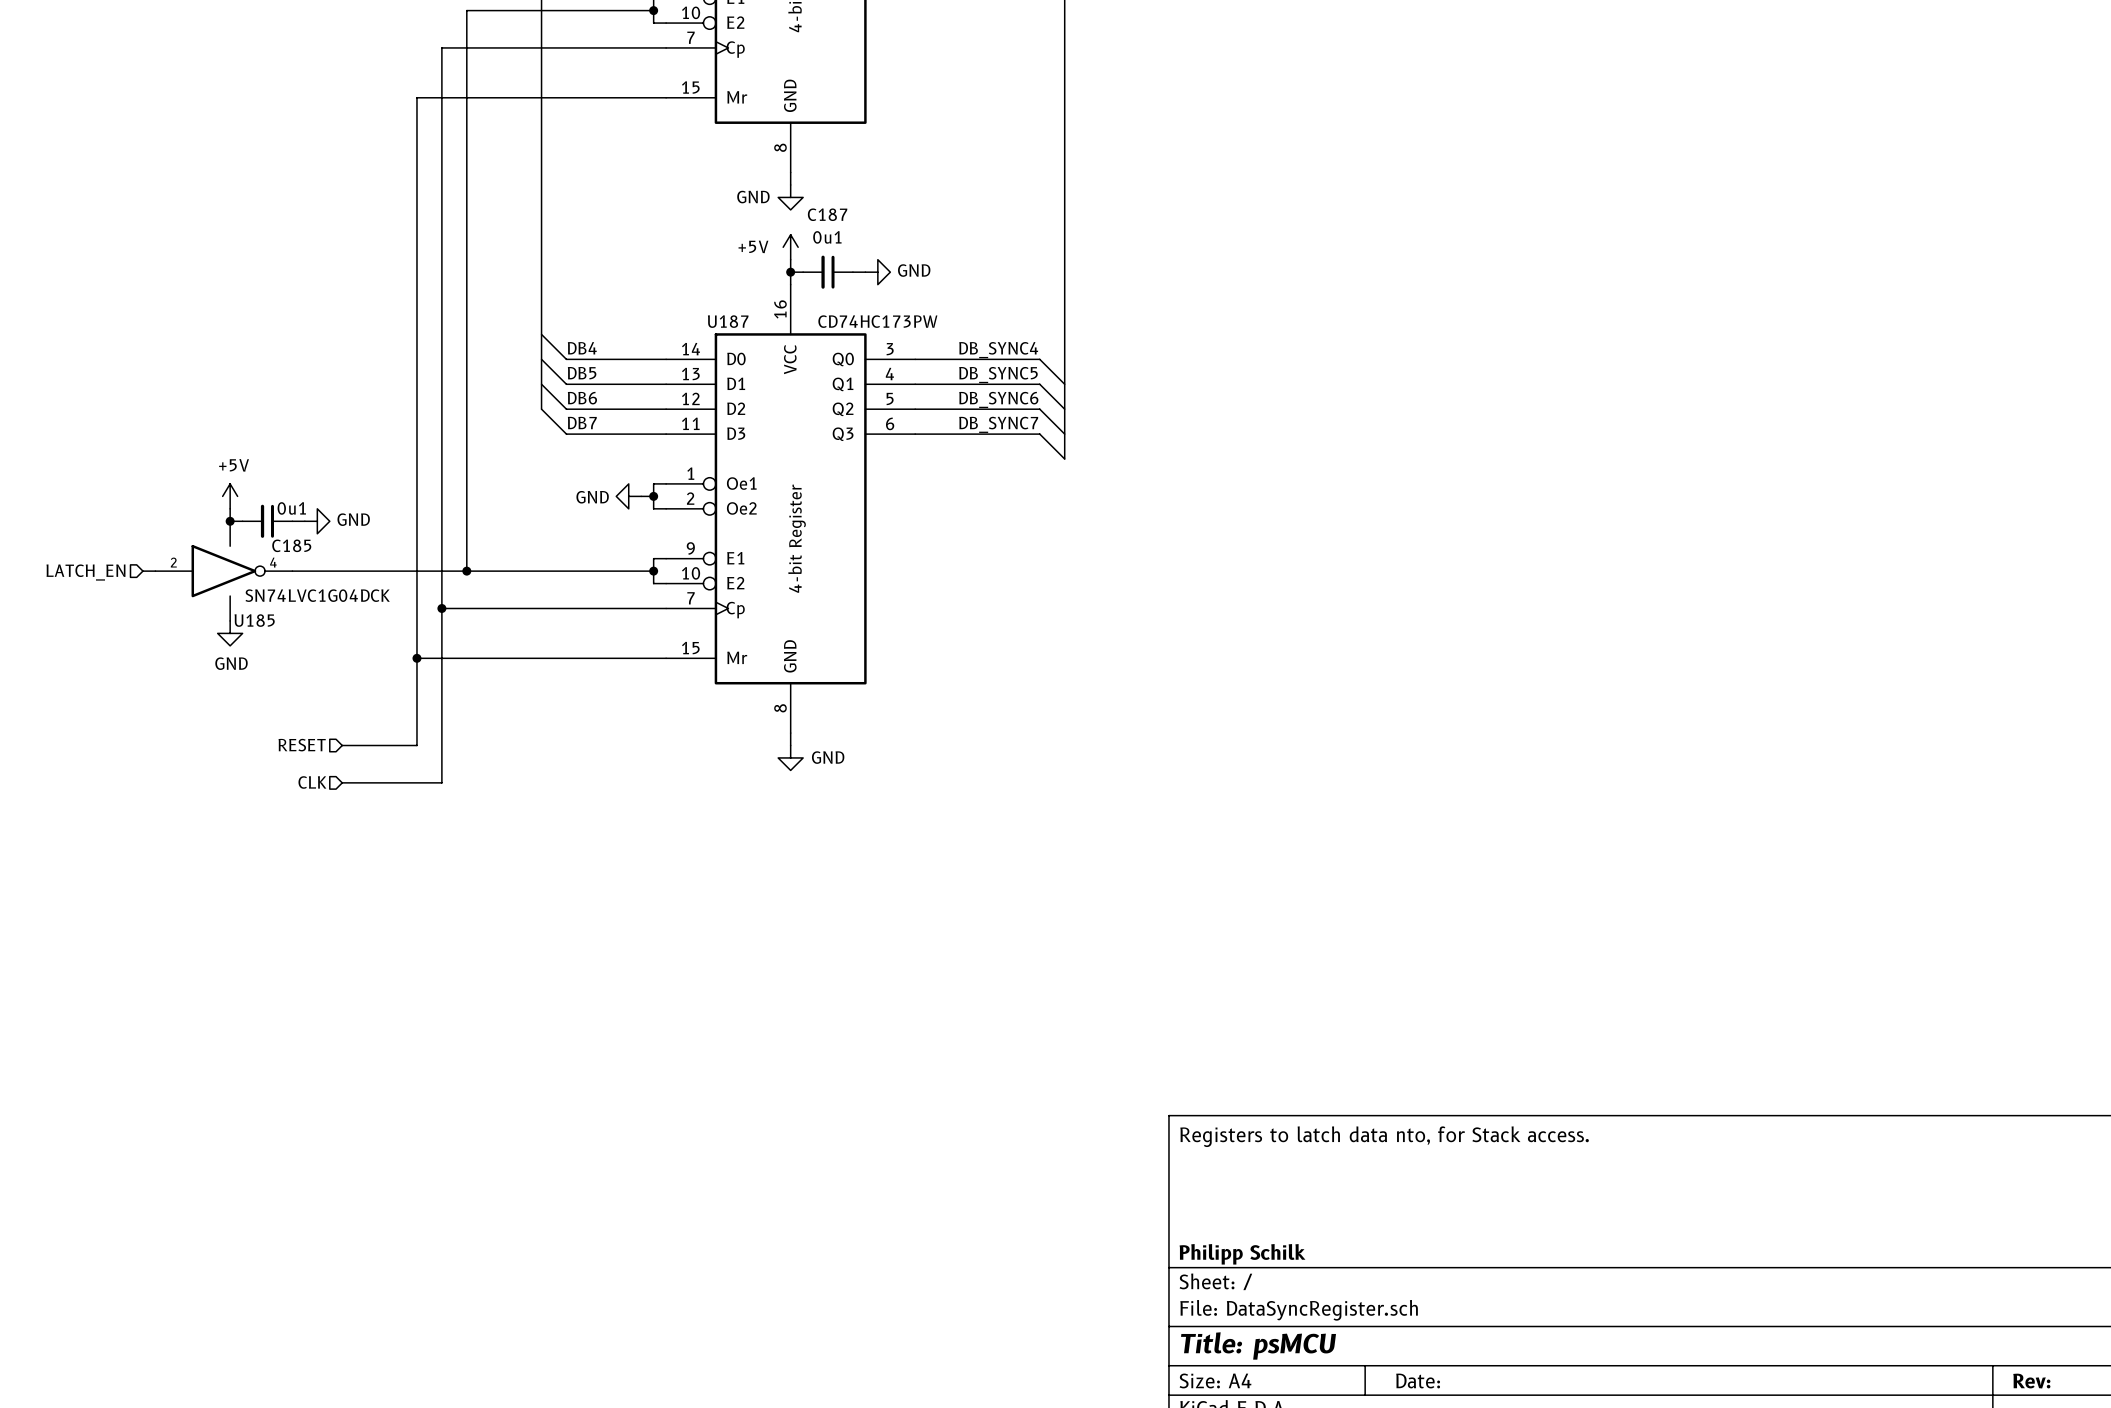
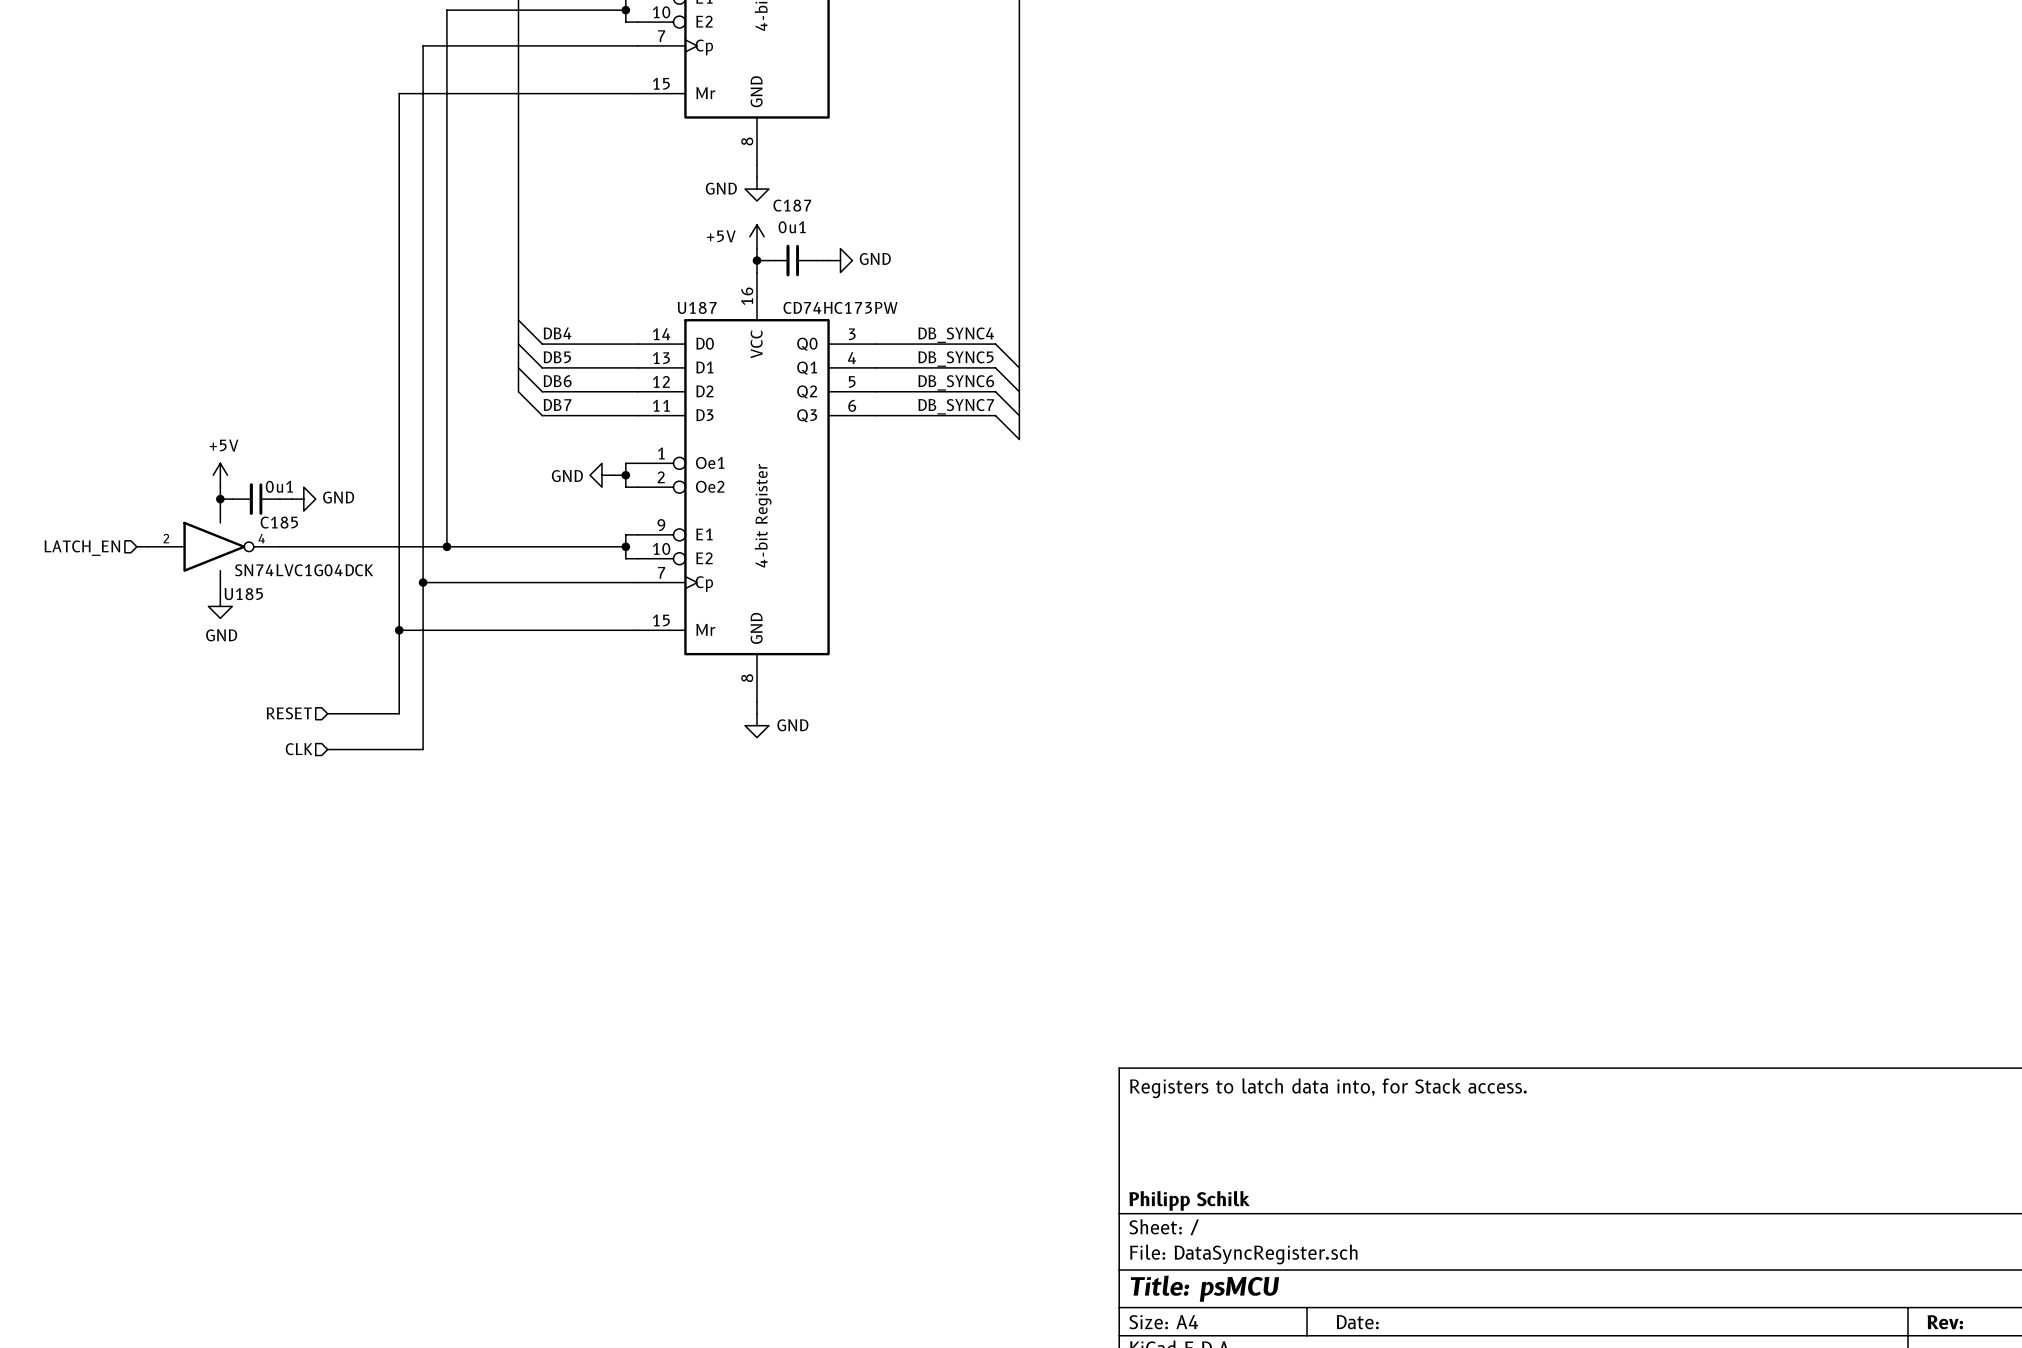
title block: Registers to latch data nto, for Stack access. (1384, 1136) -> Registers to latch data into, for Stack access. (1328, 1088)

